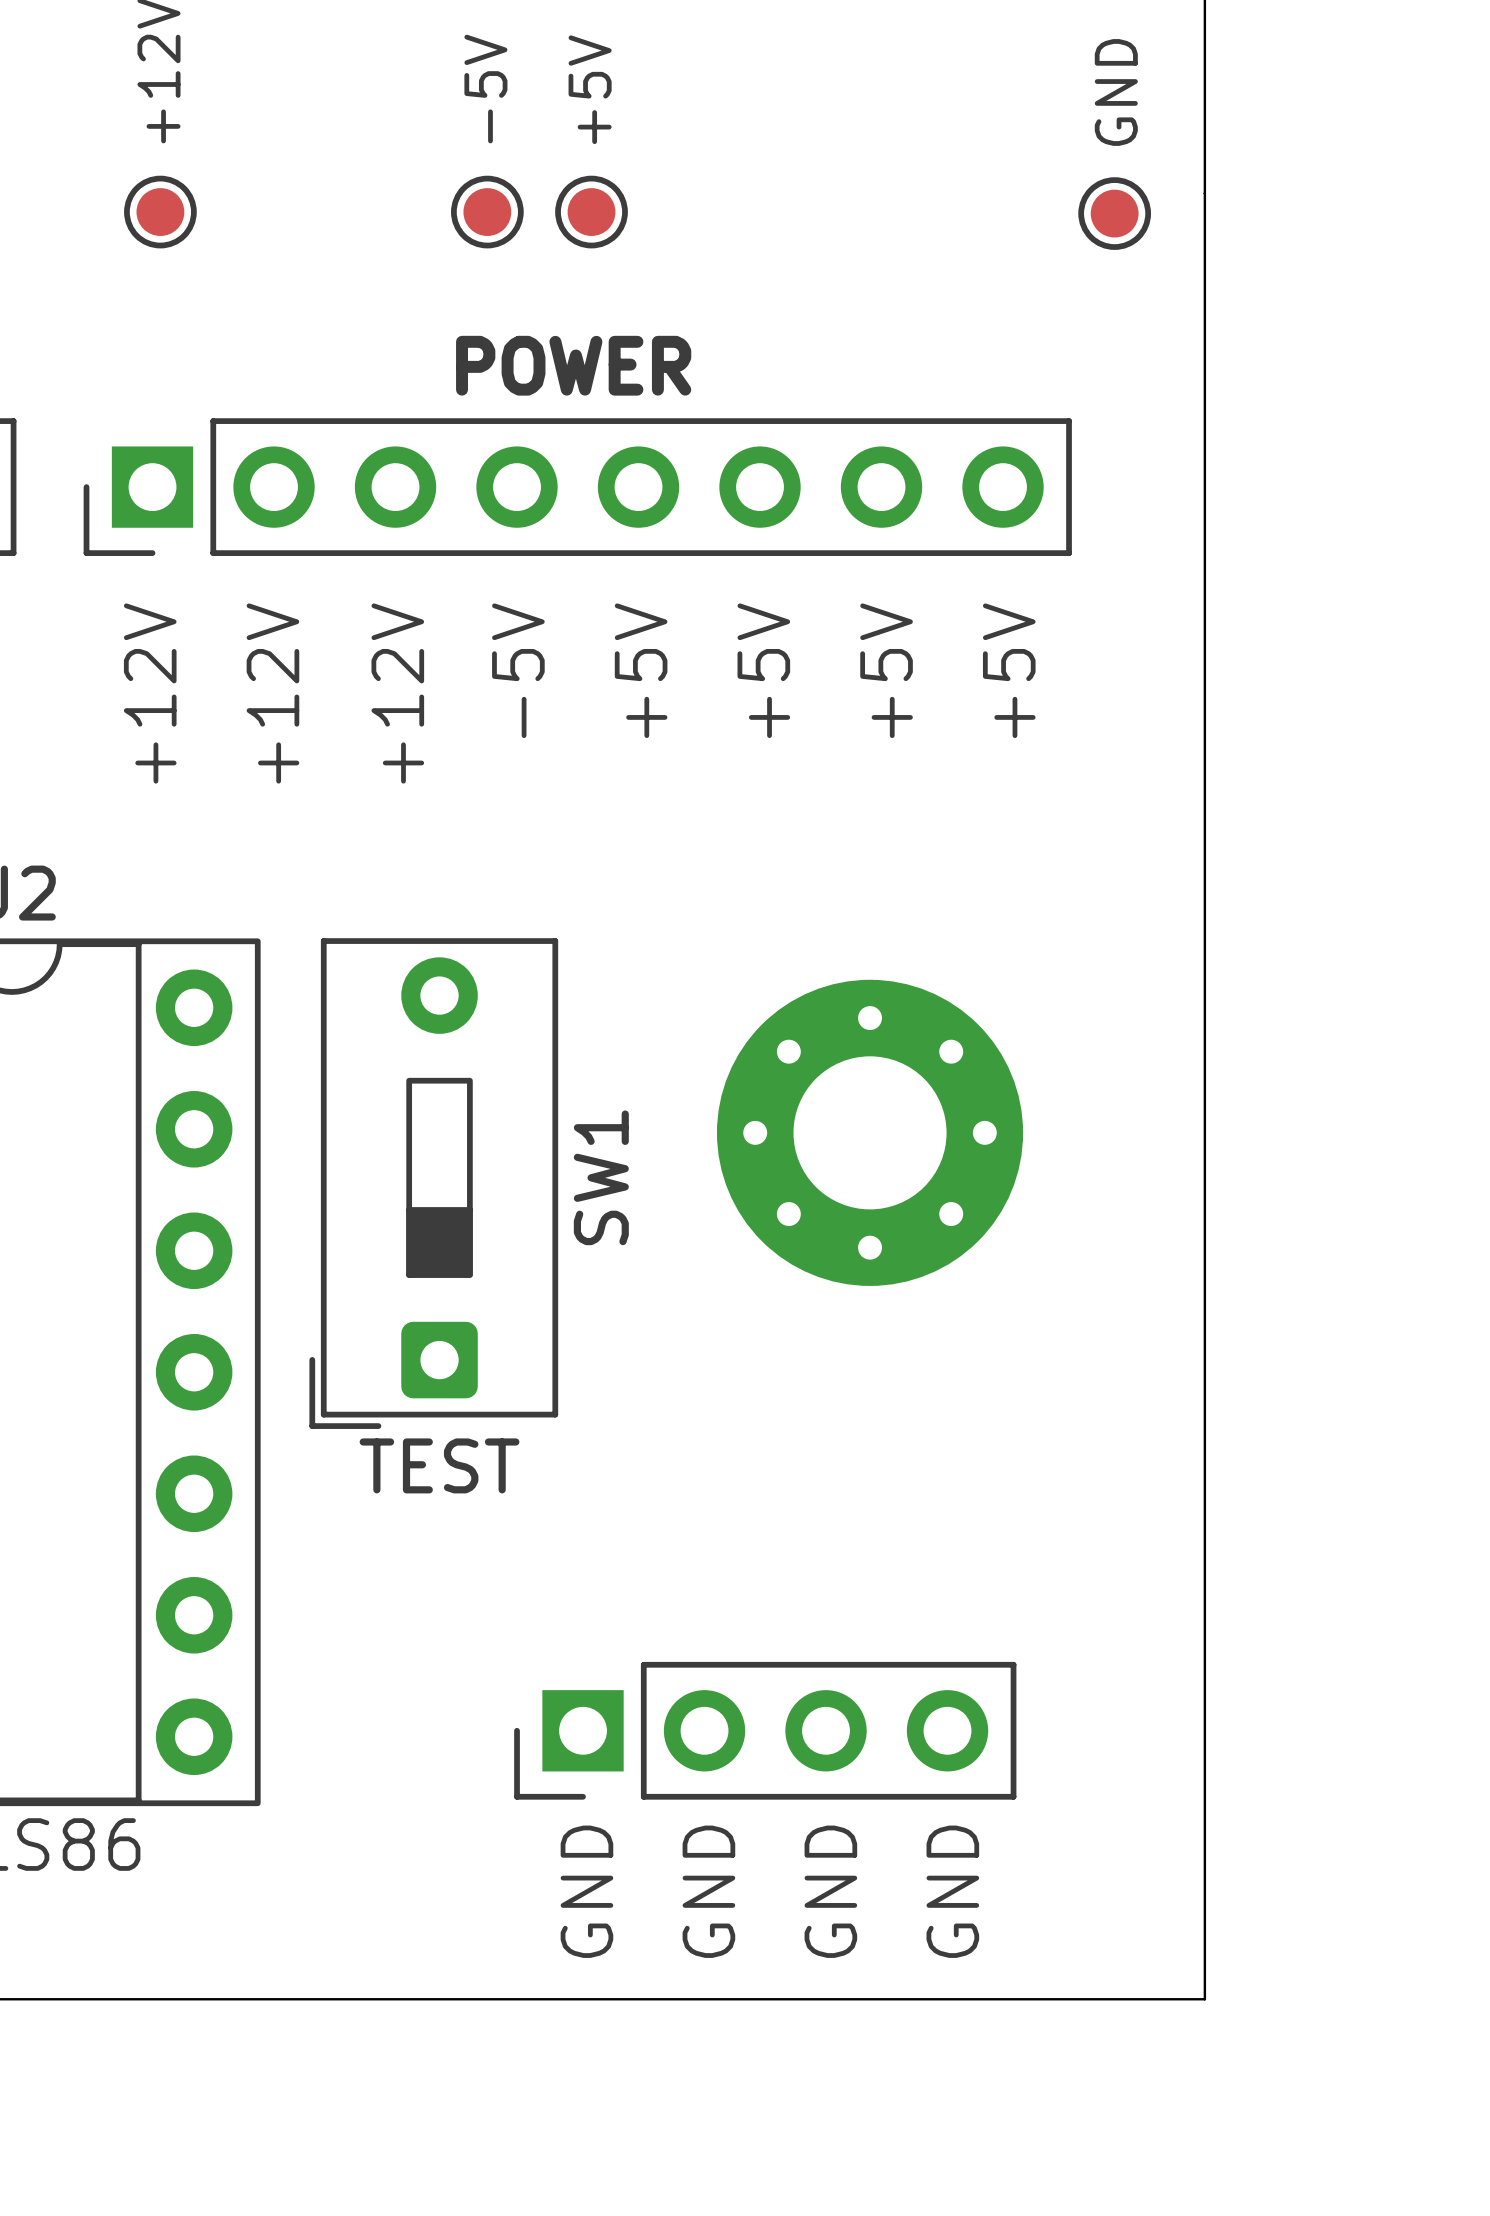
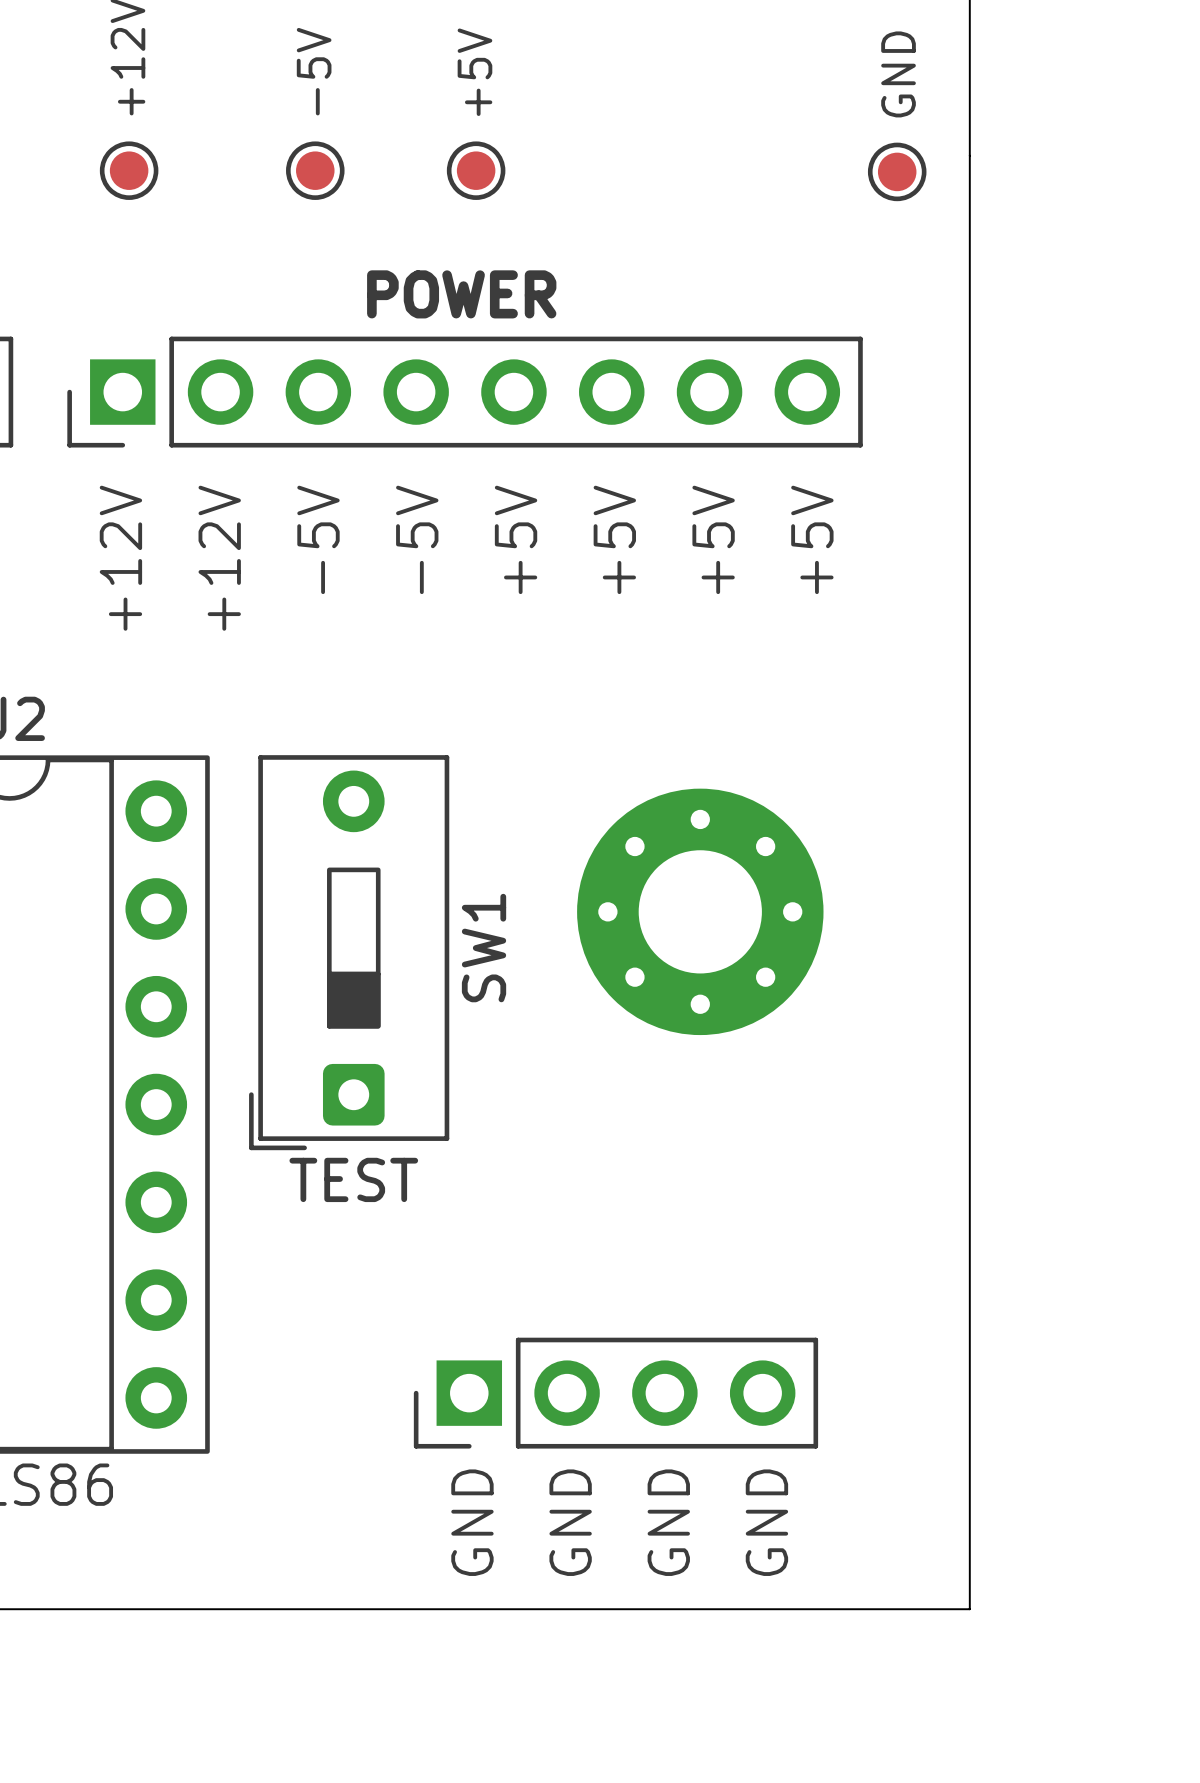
-5V position: (487, 212) -> (315, 170)
text: +12V (397, 693) -> -5V (318, 539)

